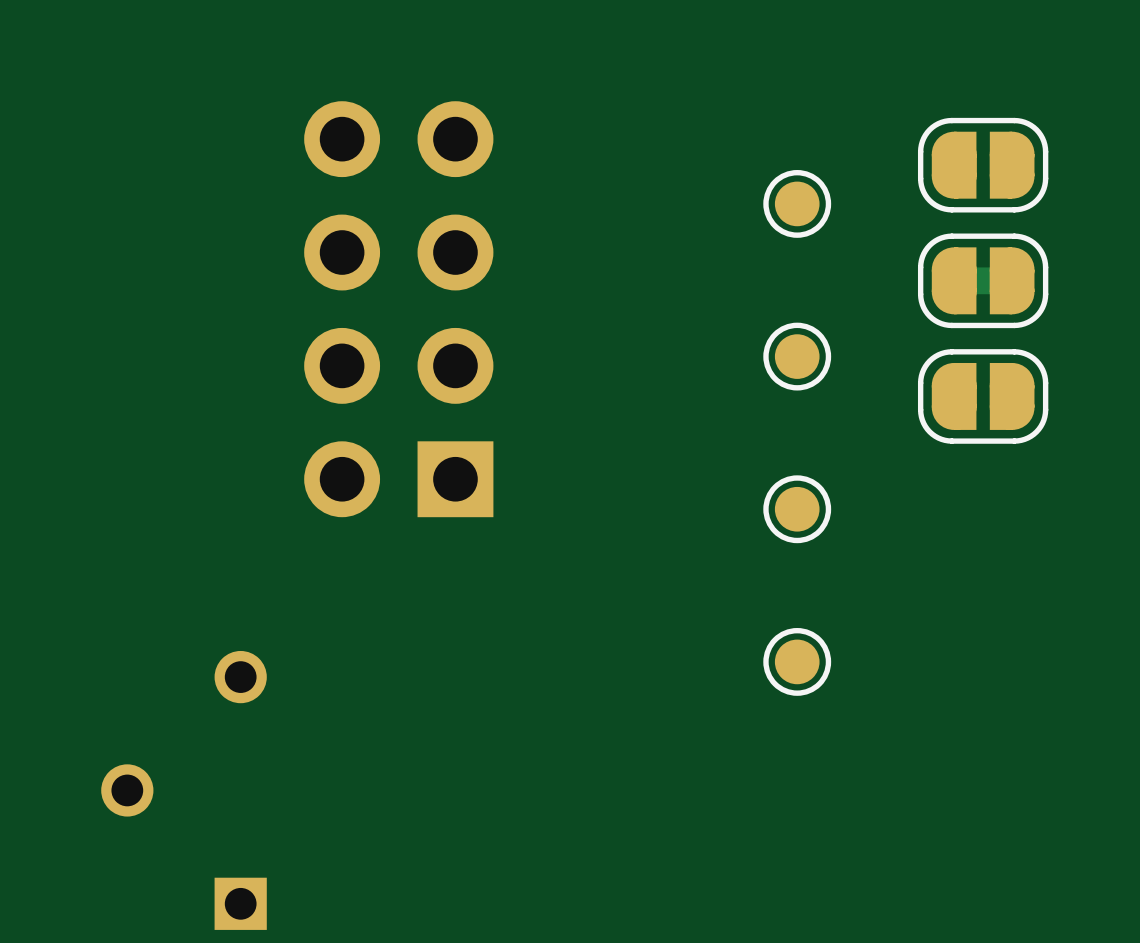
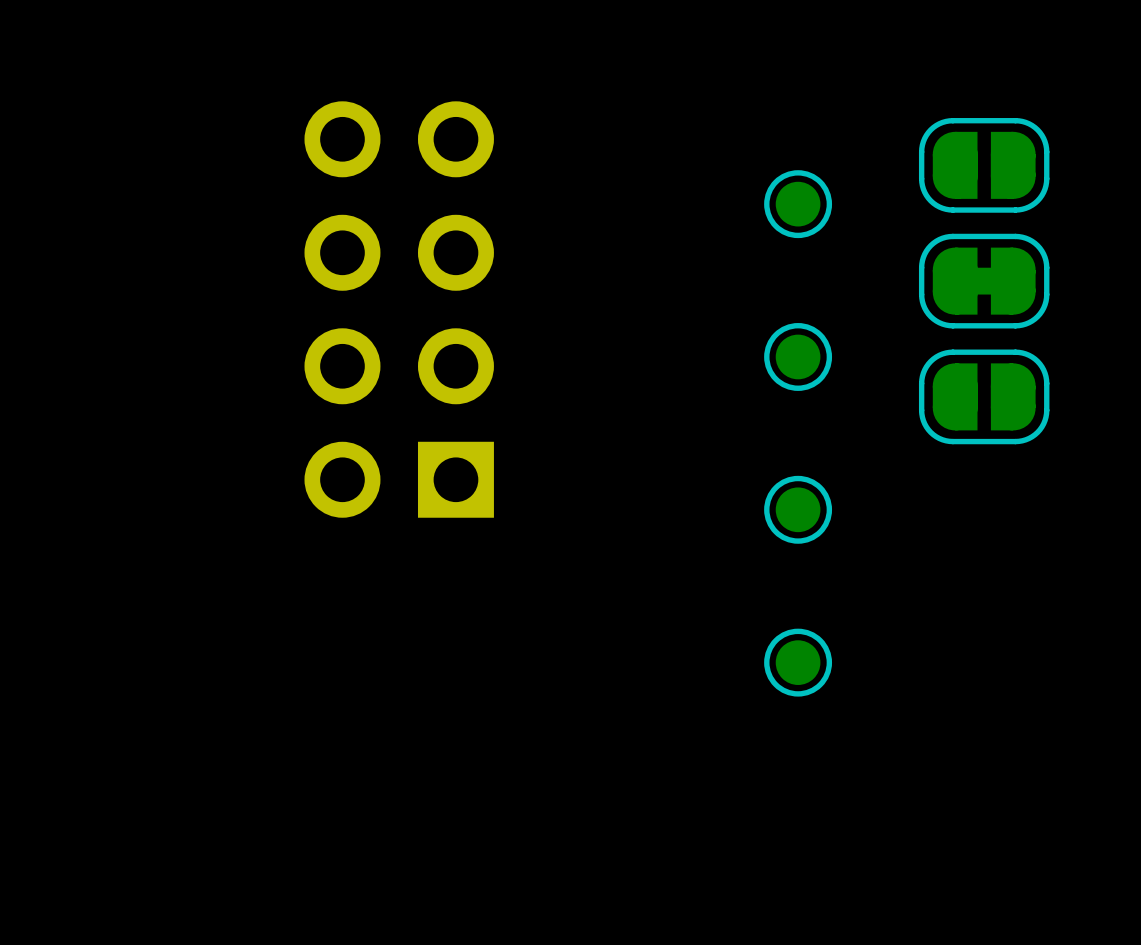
part: (184, 790) -> none

